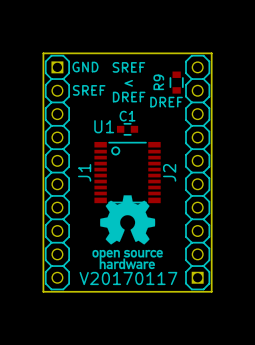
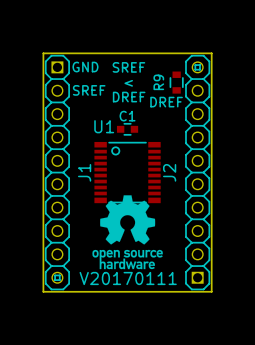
J1 footprint: [45, 54, 70, 291] -> [45, 54, 70, 291]
J2 footprint: [185, 54, 211, 291] -> [185, 54, 211, 291]
text: V20170117 (128, 278) -> V20170111 (128, 278)

